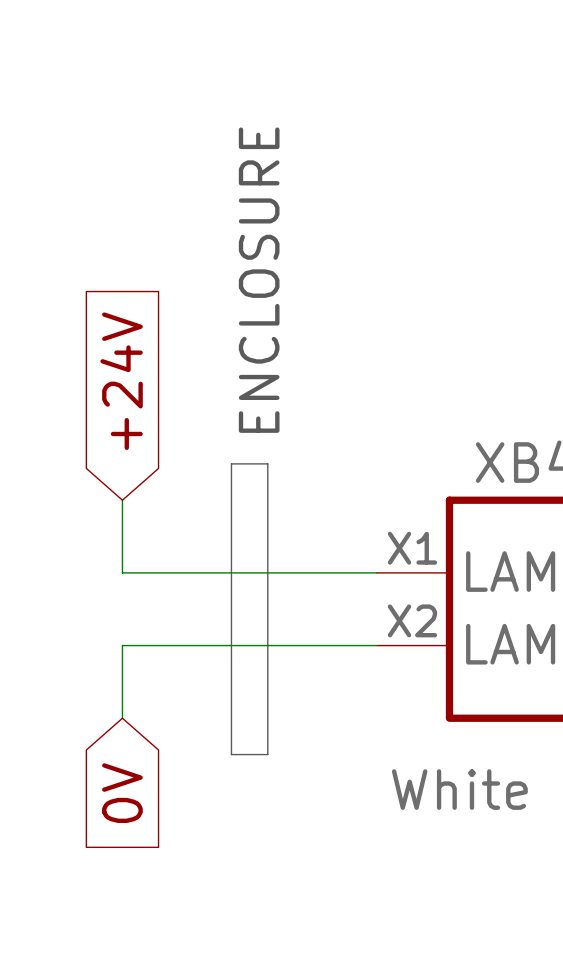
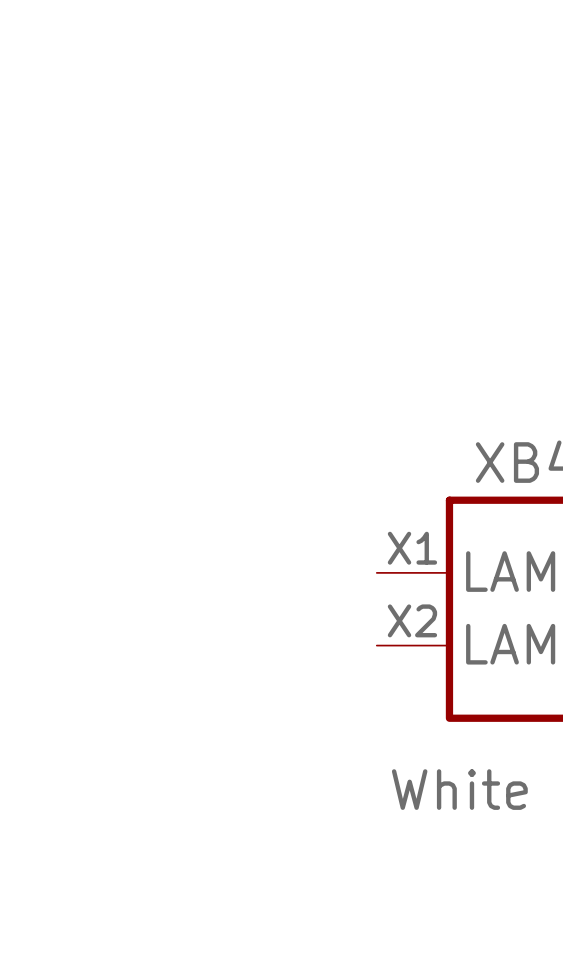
text: ENCLOSURE (259, 280) -> none
global label: +24V (121, 381) -> none
line: (231, 463) (267, 463) (267, 754) (231, 754) (231, 463) -> none
wire: (122, 500) (122, 572) (376, 572) -> none
wire: (376, 645) (122, 645) (122, 718) -> none
global label: 0V (122, 793) -> none

